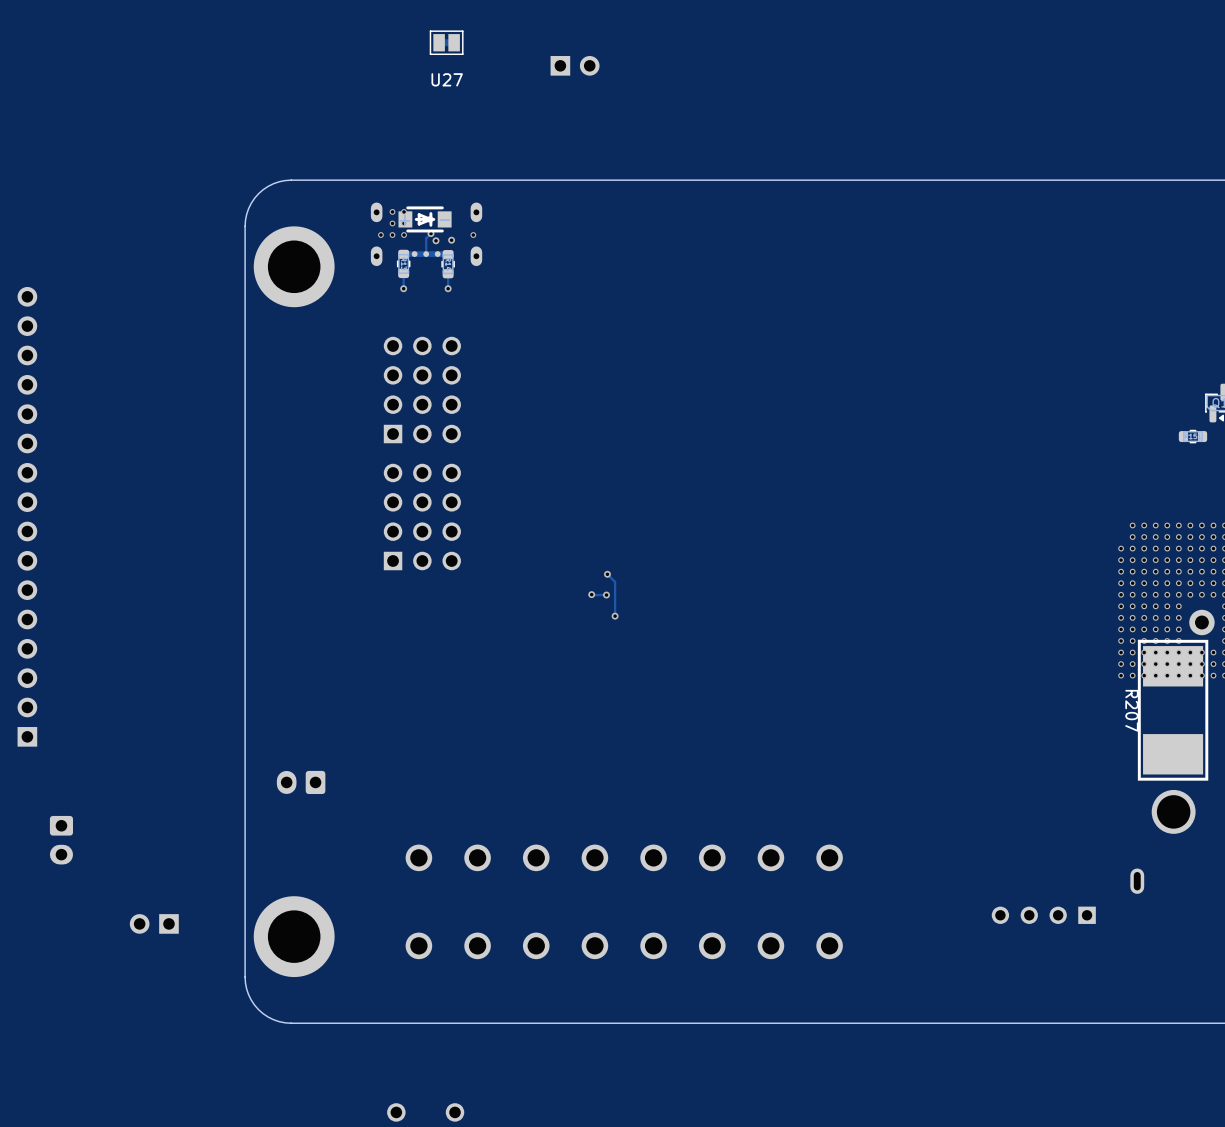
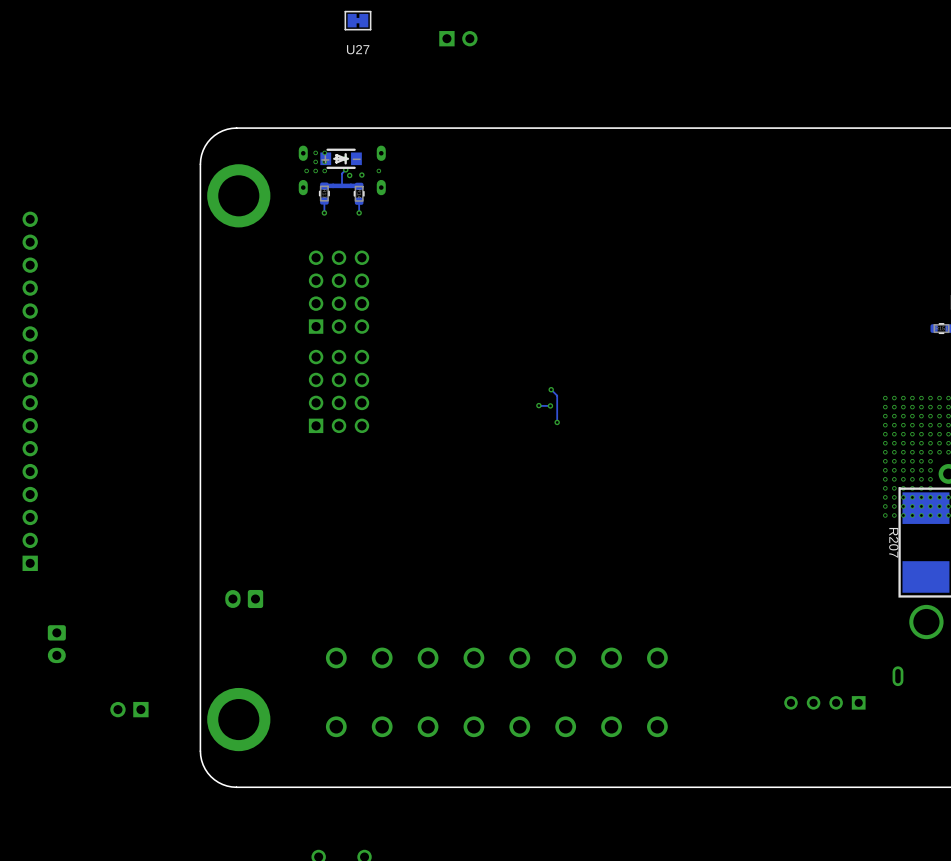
via: none -> (551, 389)
via: none -> (885, 398)
via: none -> (538, 405)
via: none -> (550, 405)
via: none -> (885, 407)
via: none -> (557, 422)
track: (607, 574) (615, 581) (615, 616) -> (551, 389) (557, 395) (557, 422)
via: (607, 574) -> none
track: (591, 594) (606, 595) -> (538, 405) (550, 405)
via: (591, 594) -> none
via: (606, 595) -> none
via: (615, 616) -> none

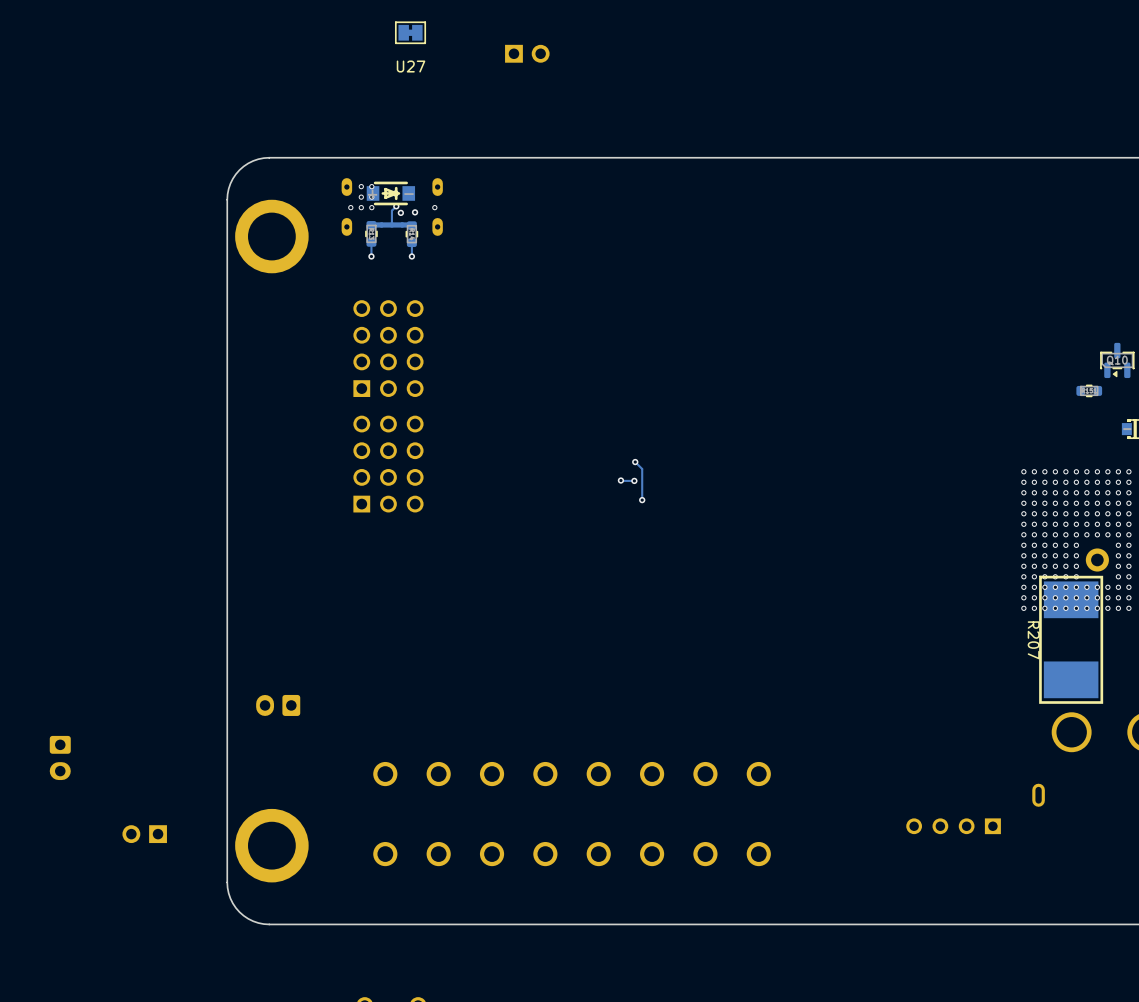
part: (30, 391) -> none

